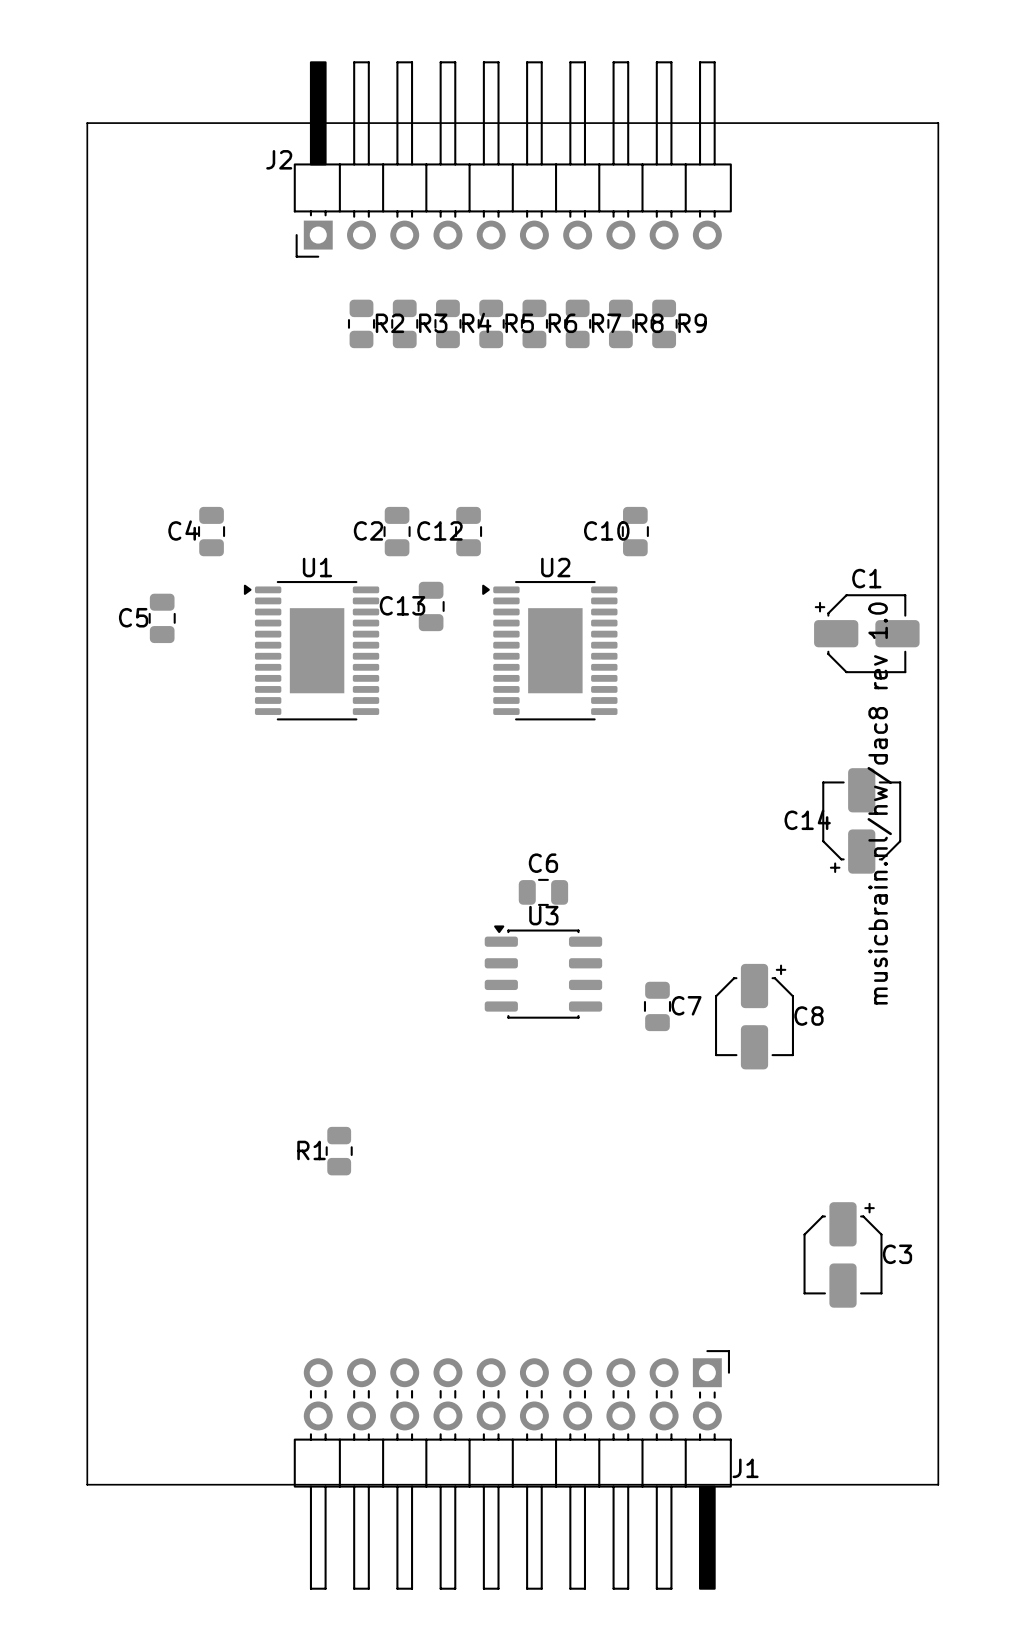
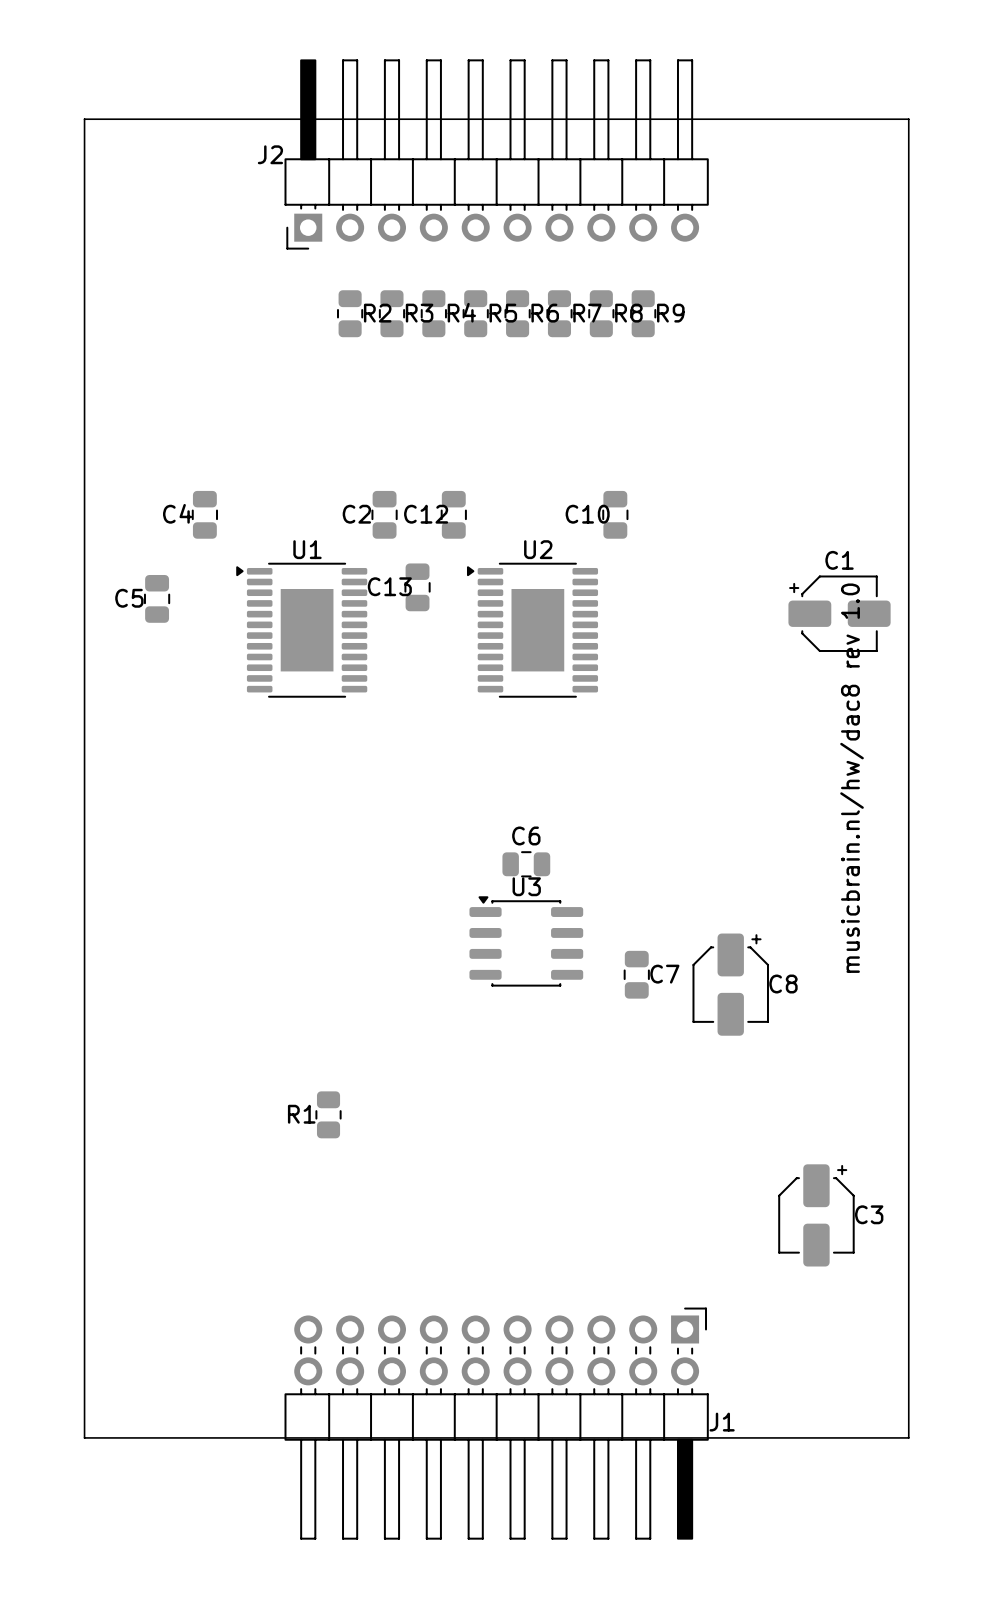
C14: (861, 820) -> none

